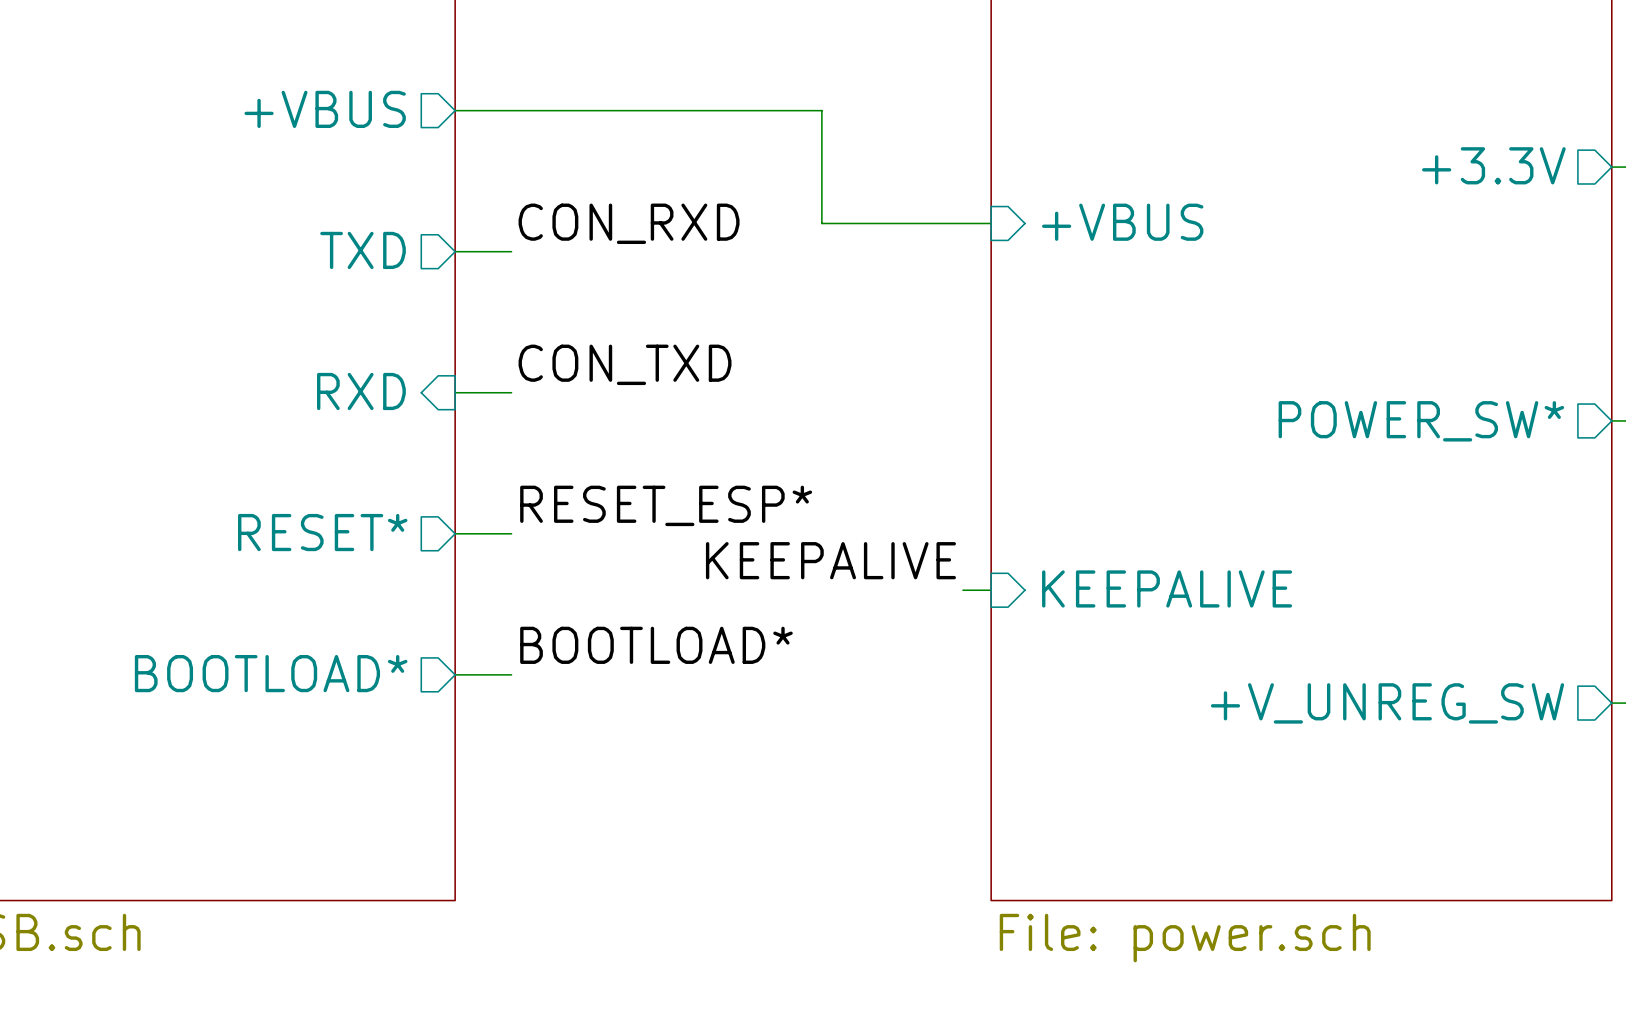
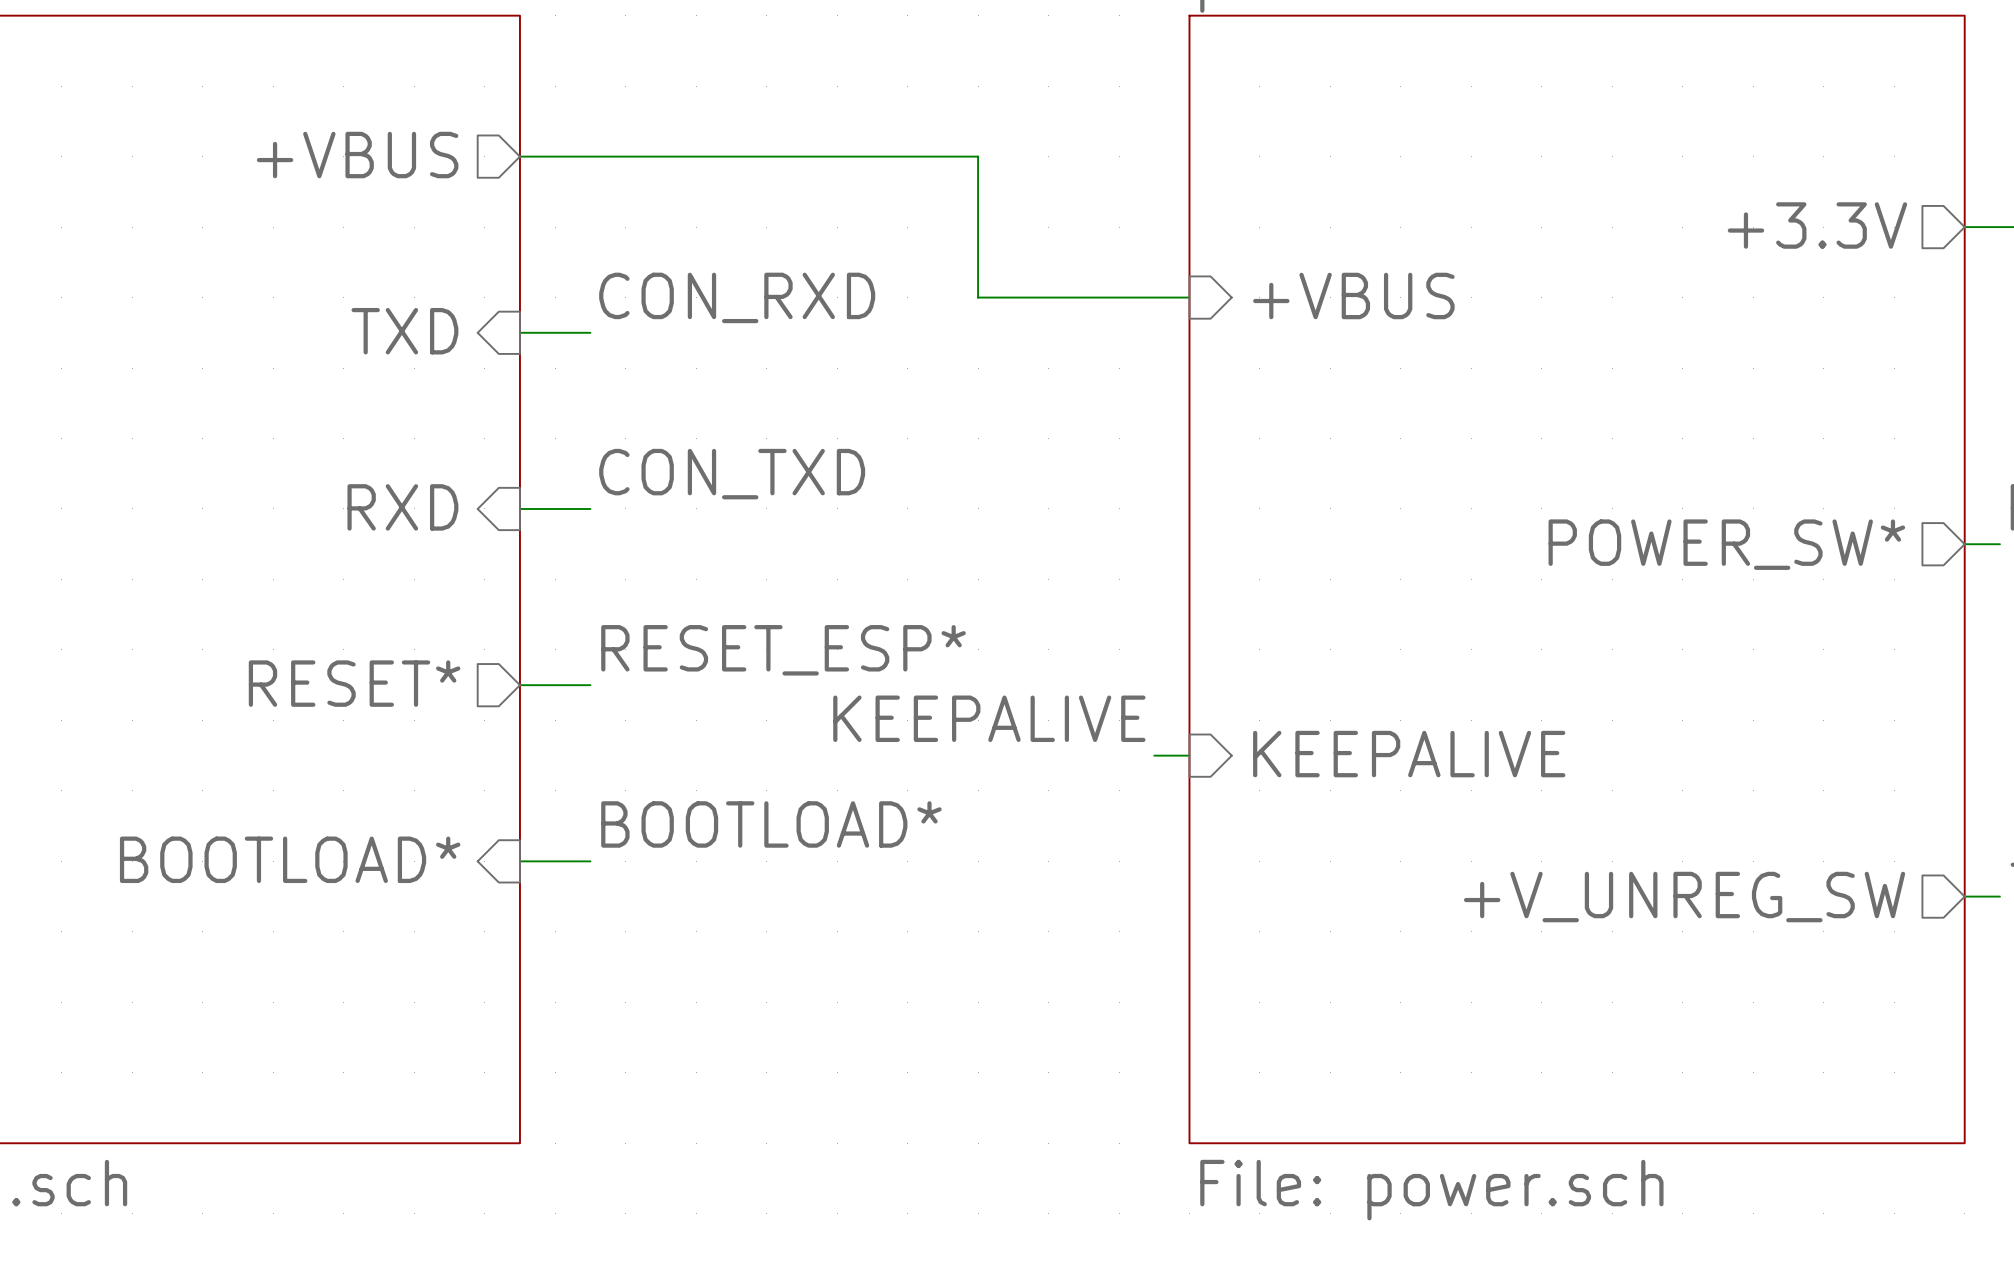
sheet pin shape: output (363, 250) -> input (404, 331)
sheet pin shape: output (271, 673) -> input (290, 859)

